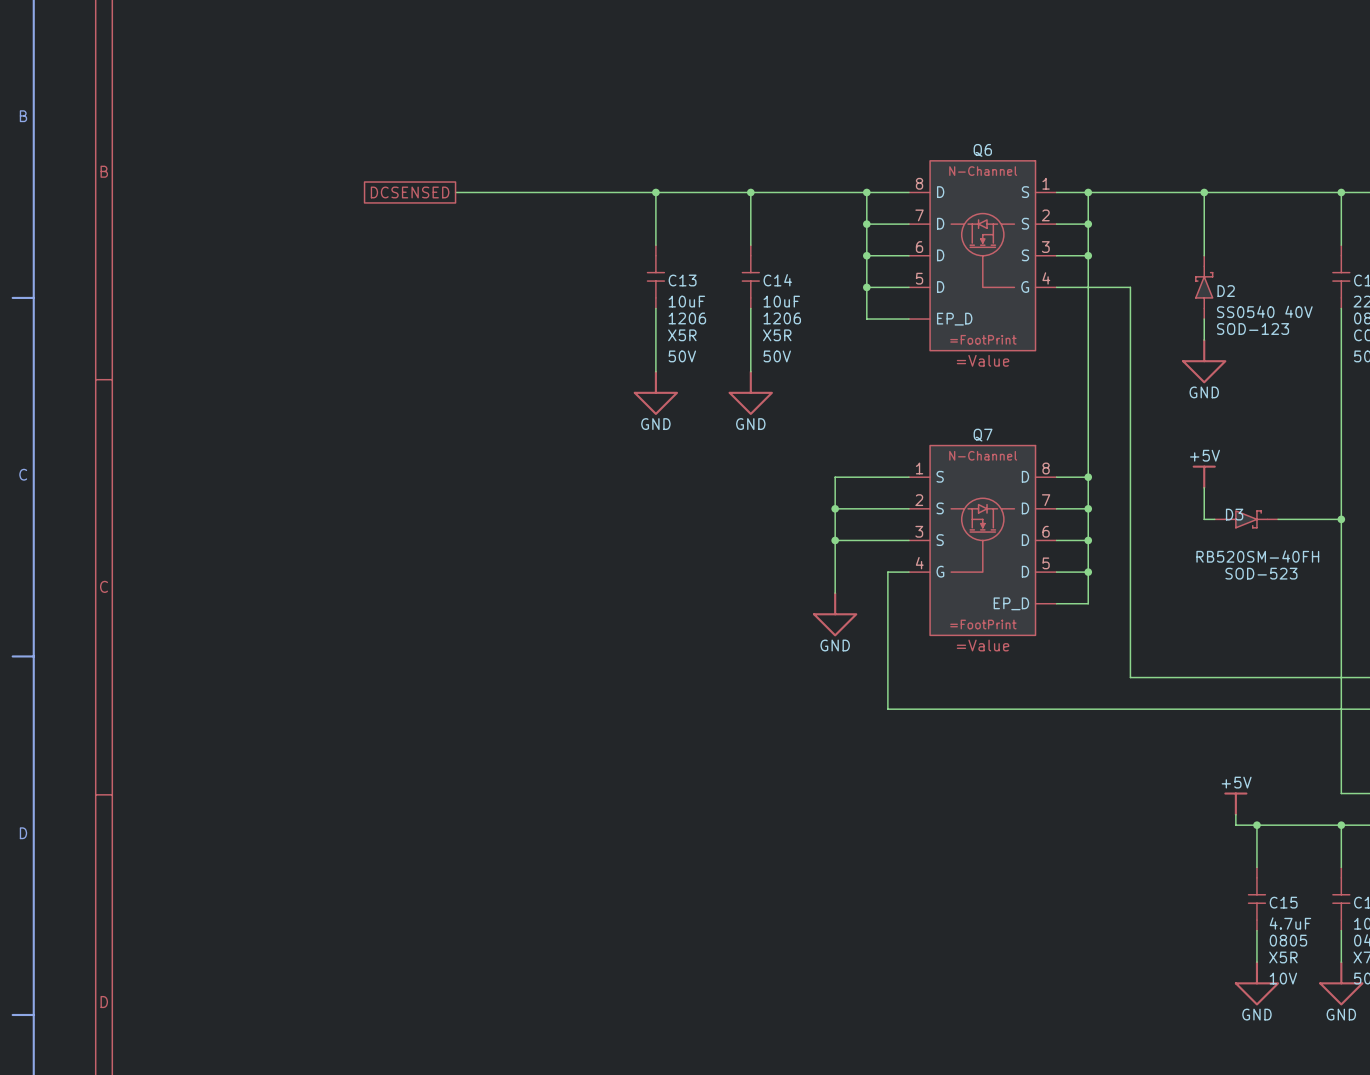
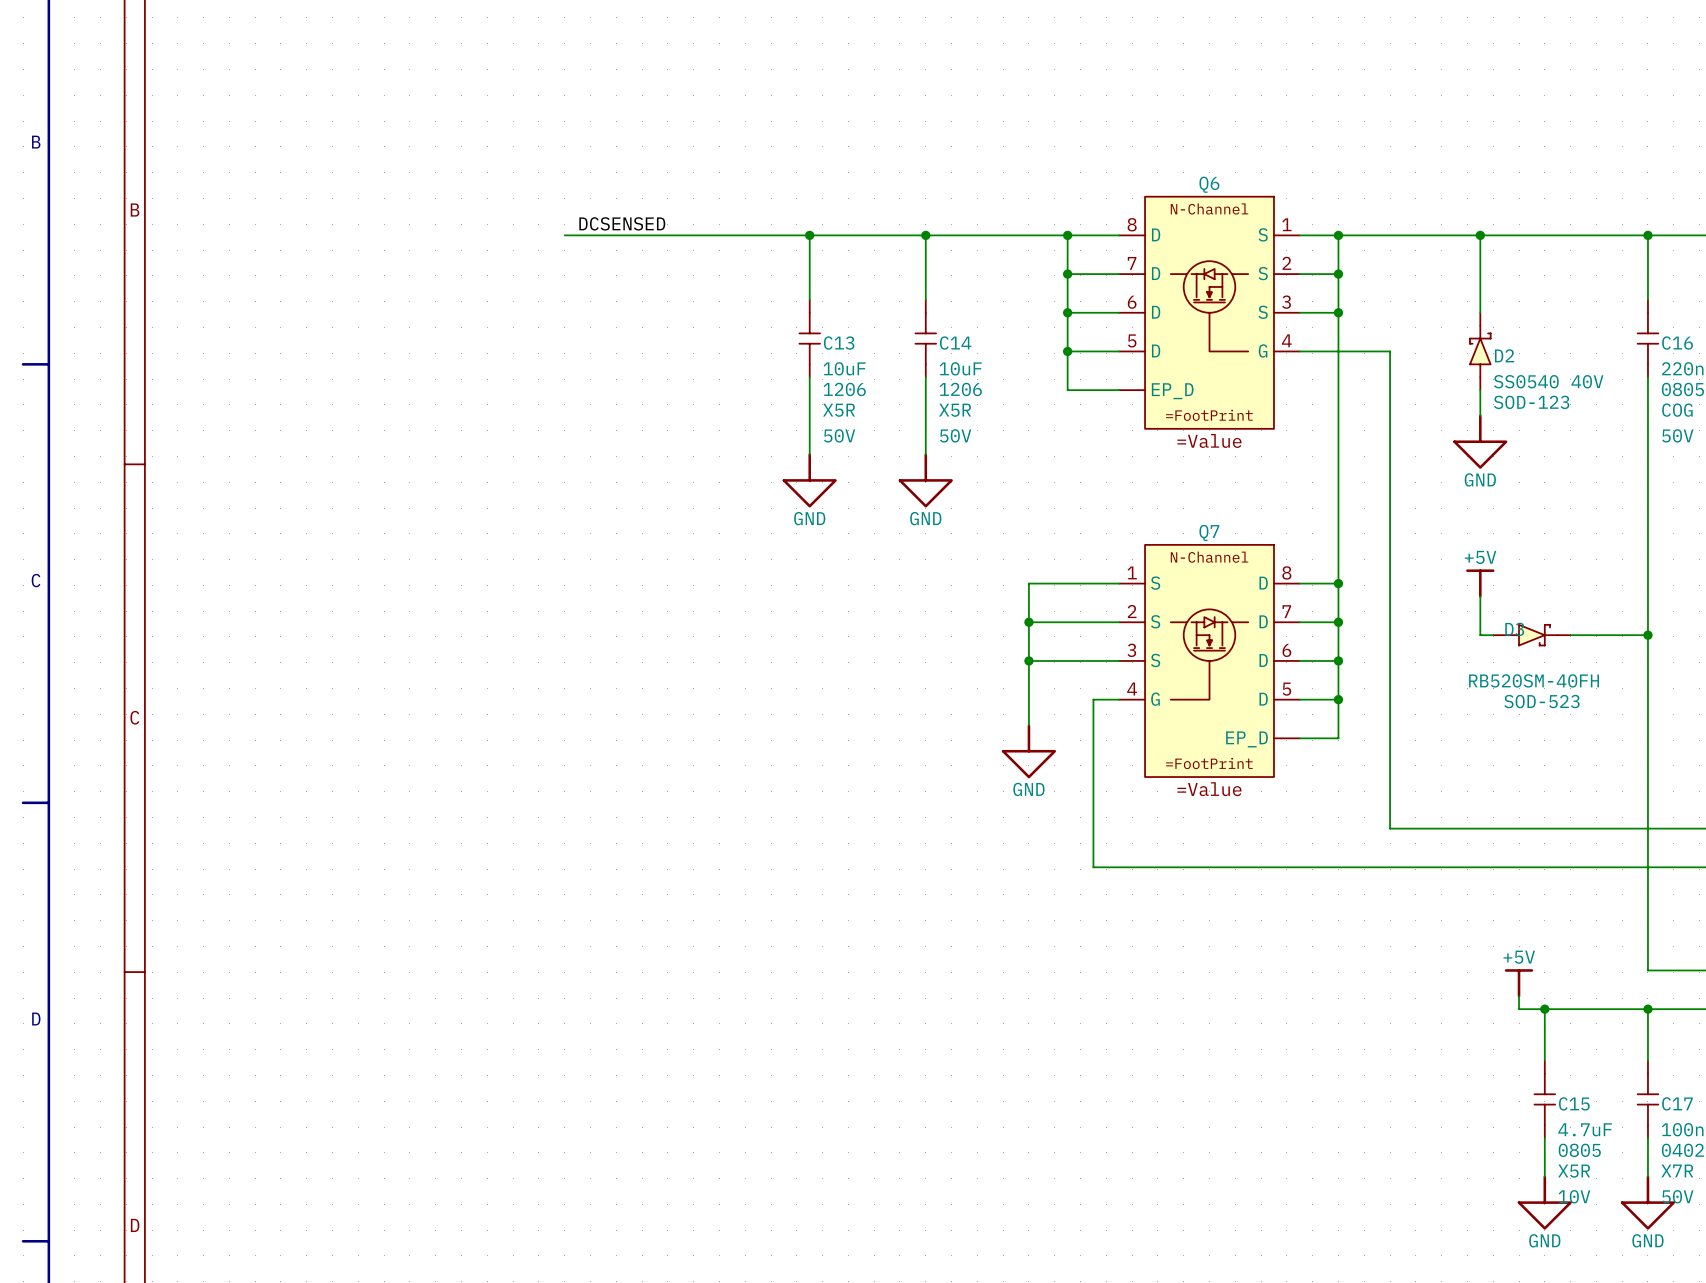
label: none -> DCSENSED (622, 223)
global label: DCSENSED (410, 192) -> none

